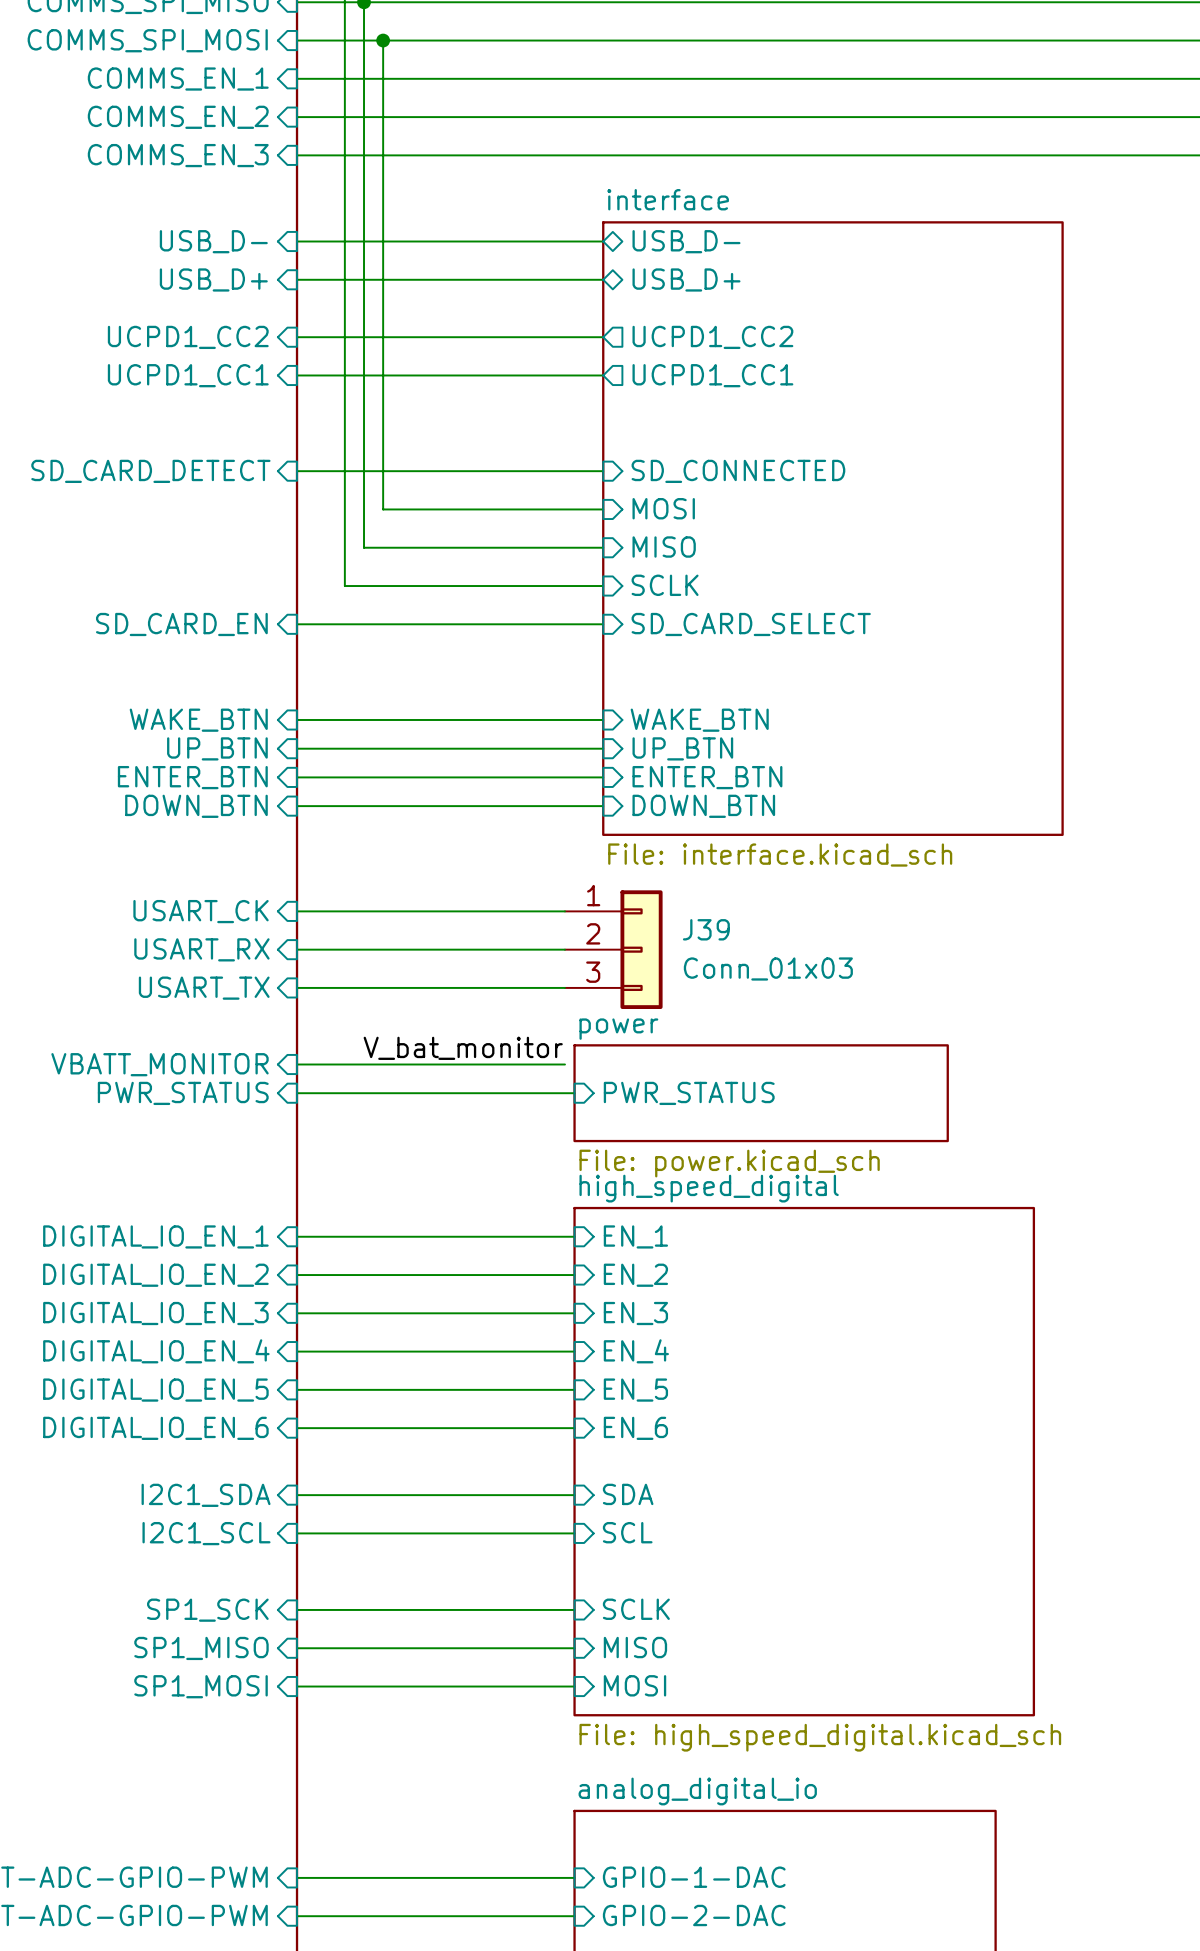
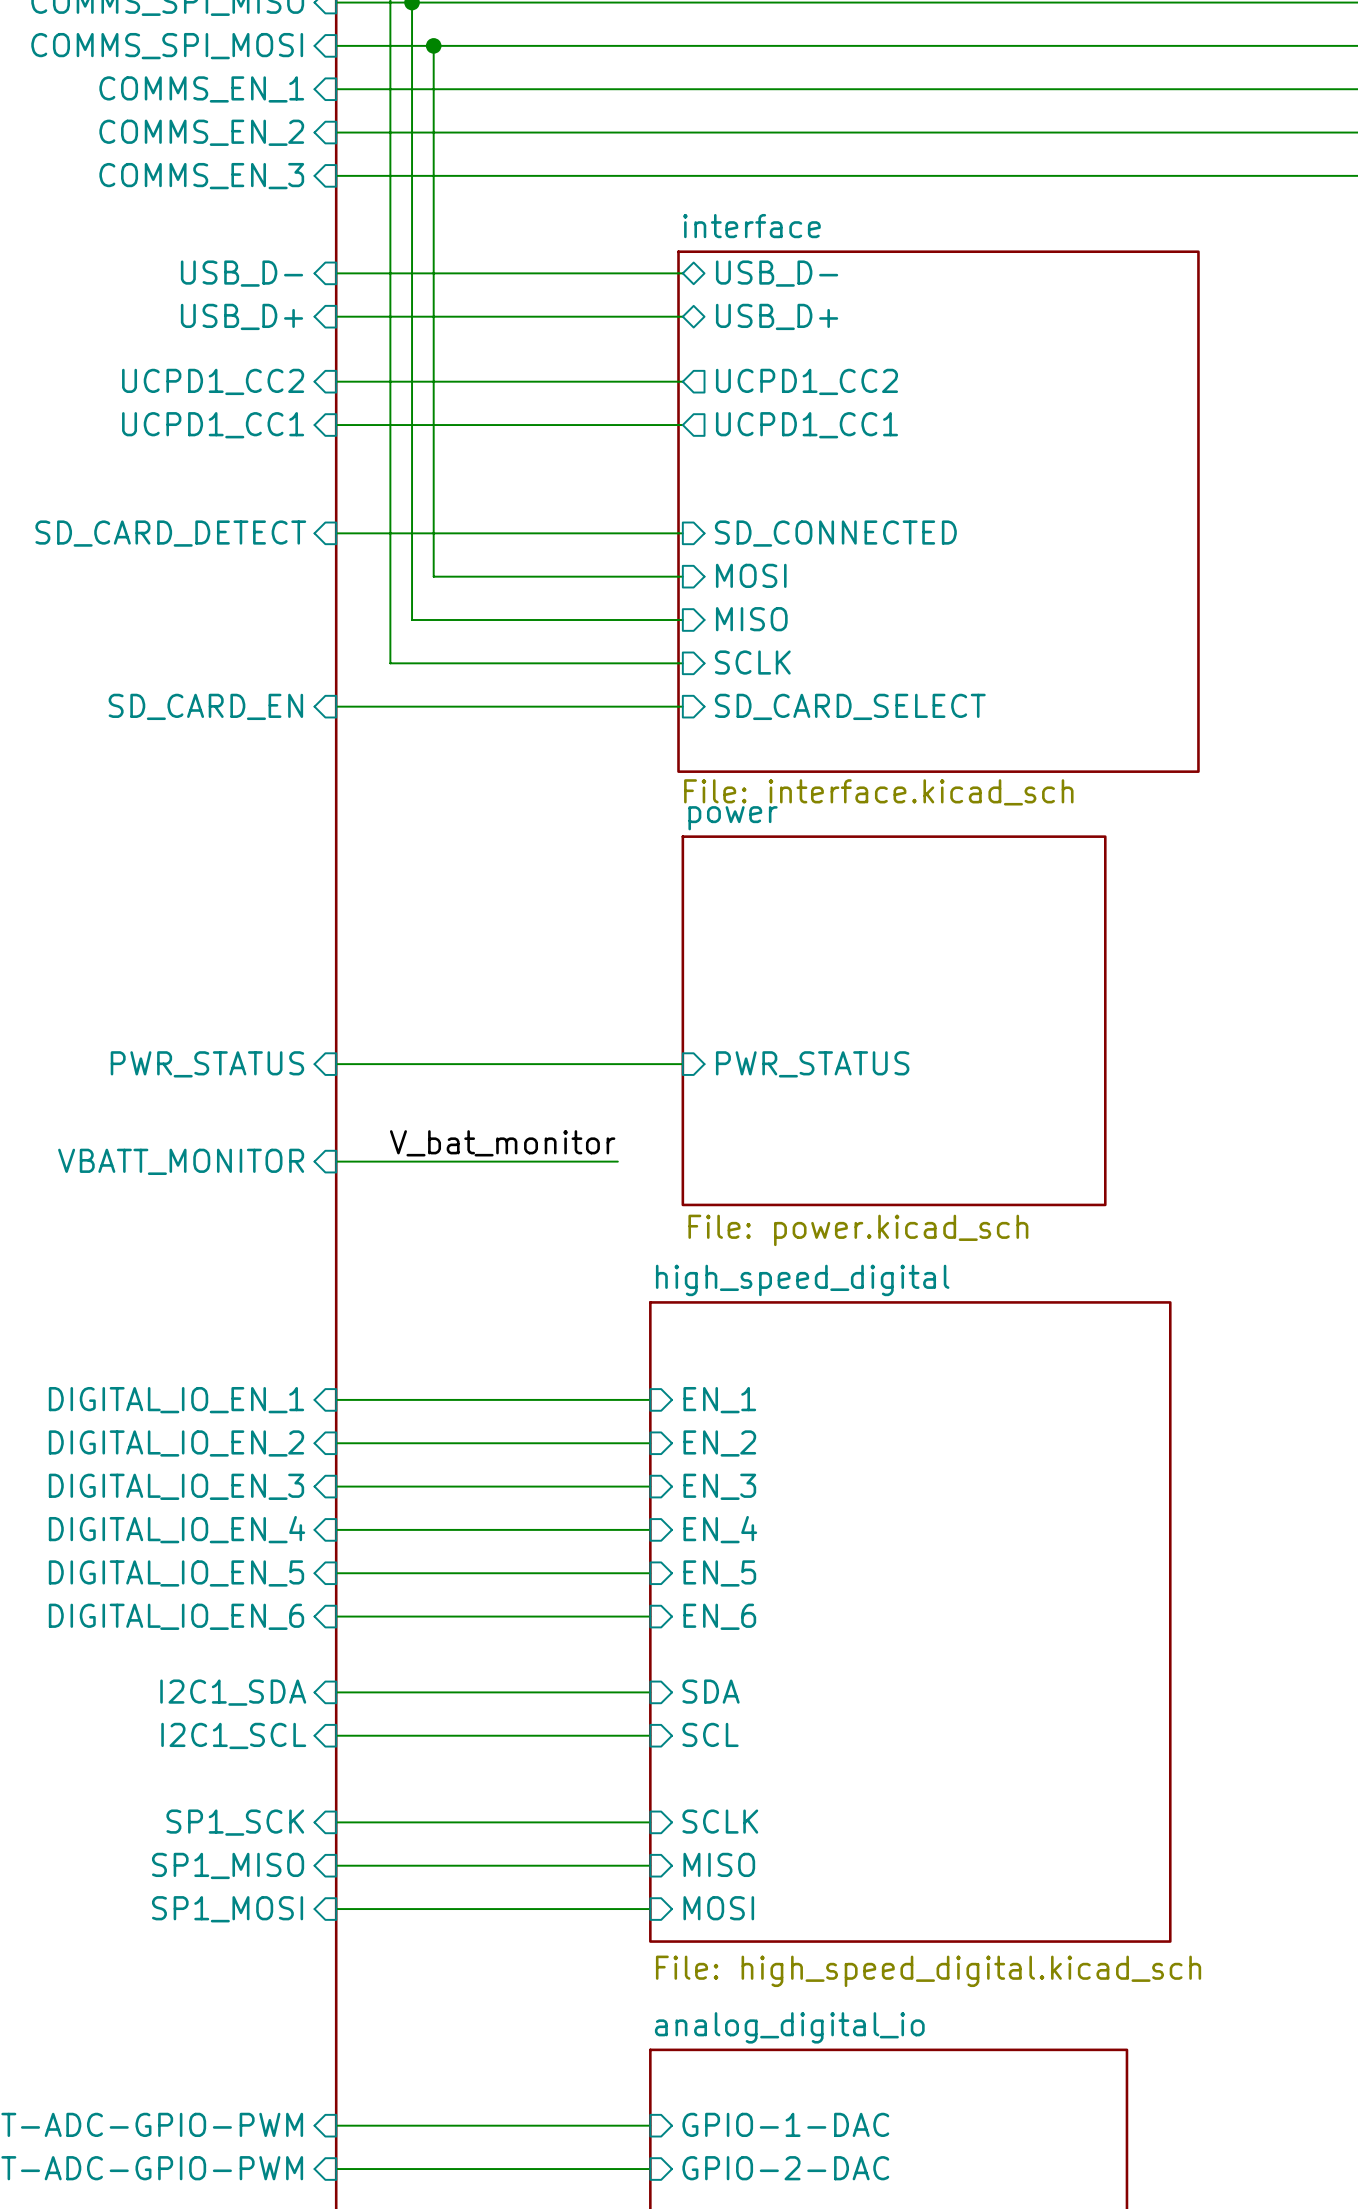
sheet interface: none -> File: interface.kicad_sch (938, 511)
sheet interface: File: interface.kicad_sch (832, 528) -> none
wire: (297, 719) (603, 719) -> none
sheet pin: WAKE_BTN (198, 720) -> none
sheet pin: WAKE_BTN (699, 720) -> none
sheet pin: UP_BTN (217, 748) -> none
wire: (297, 748) (603, 748) -> none
sheet pin: UP_BTN (682, 748) -> none
sheet pin: ENTER_BTN (192, 777) -> none
wire: (297, 777) (603, 777) -> none
sheet pin: ENTER_BTN (707, 777) -> none
sheet pin: DOWN_BTN (196, 806) -> none
wire: (297, 806) (603, 806) -> (336, 1064) (682, 1064)
sheet pin: DOWN_BTN (703, 806) -> none
sheet power: none -> File: power.kicad_sch (894, 1020)
sheet pin: USART_CK (201, 911) -> none
wire: (297, 911) (564, 911) -> none
sheet pin: USART_RX (201, 949) -> none
wire: (297, 949) (564, 949) -> none
J39: Conn_01x03 (613, 949) -> none
wire: (297, 987) (564, 987) -> none
sheet pin: USART_TX (204, 988) -> none
wire: none -> (336, 1161) (617, 1161)
label position: V_bat_monitor (463, 1048) -> V_bat_monitor (502, 1143)
sheet pin position: VBATT_MONITOR (160, 1064) -> VBATT_MONITOR (181, 1161)
wire: (297, 1064) (564, 1064) -> none
sheet pin position: PWR_STATUS (183, 1093) -> PWR_STATUS (207, 1064)
wire: (297, 1093) (574, 1093) -> none
sheet pin position: PWR_STATUS (689, 1093) -> PWR_STATUS (812, 1064)
sheet power: File: power.kicad_sch (761, 1093) -> none
sheet high_speed_digital: none -> File: high_speed_digital.kicad_sch (910, 1621)
sheet high_speed_digital: File: high_speed_digital.kicad_sch (804, 1461) -> none

